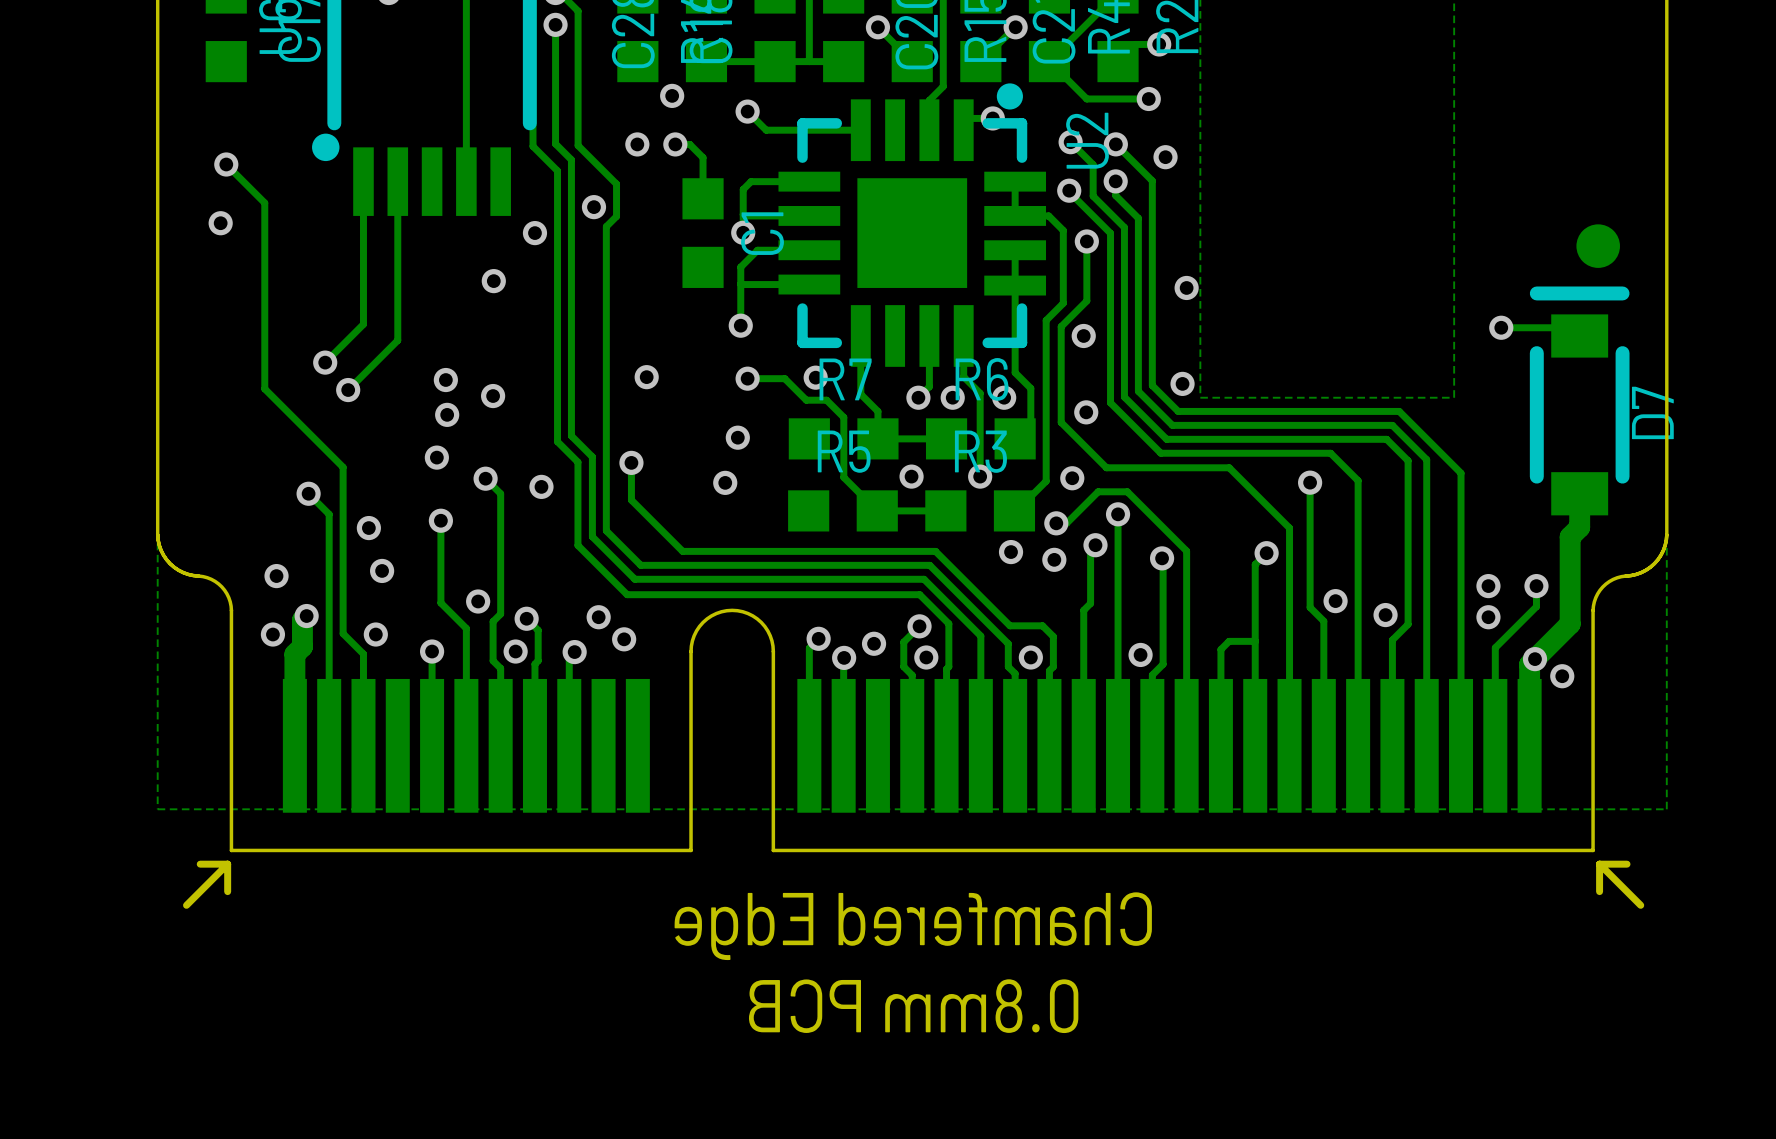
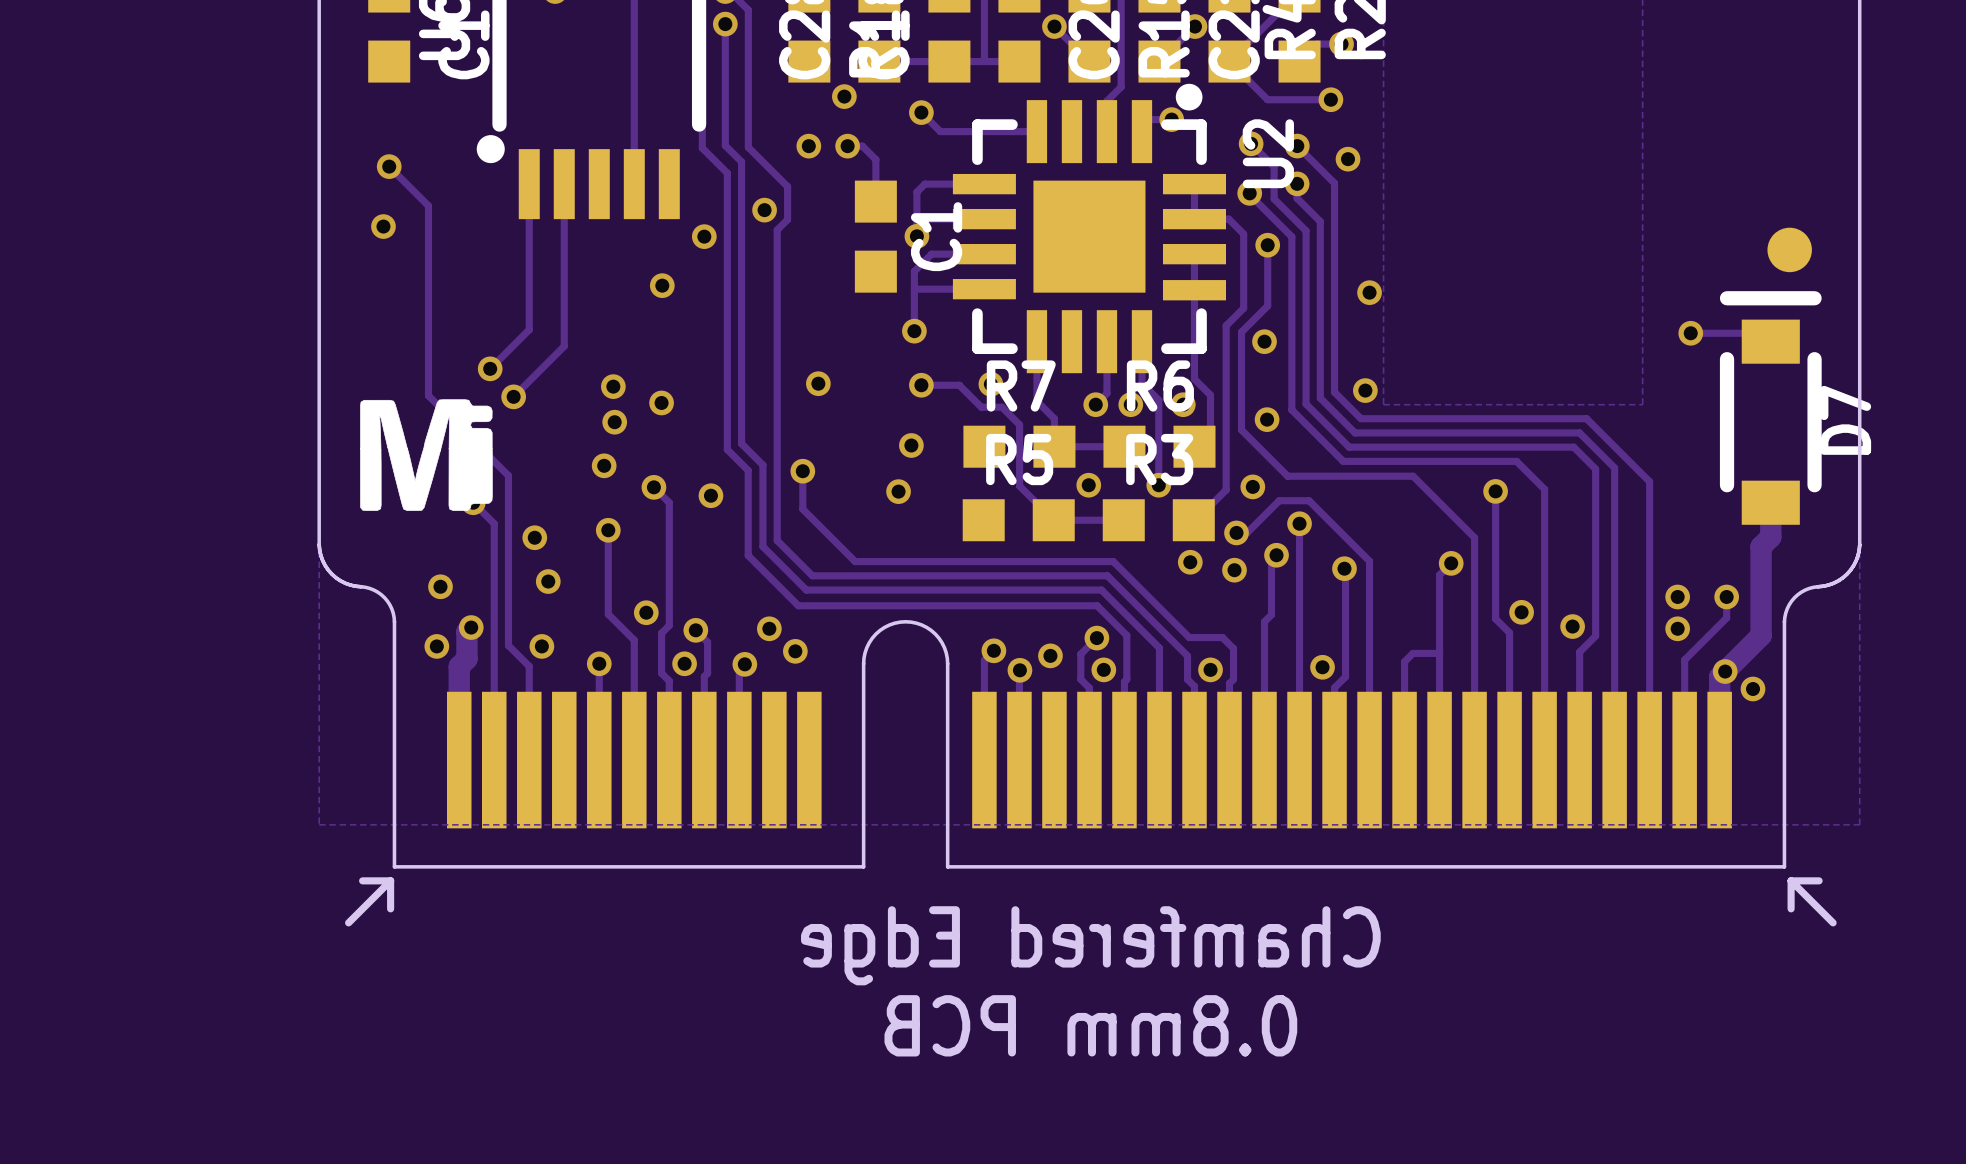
drawing: none -> [360, 399, 493, 511]

